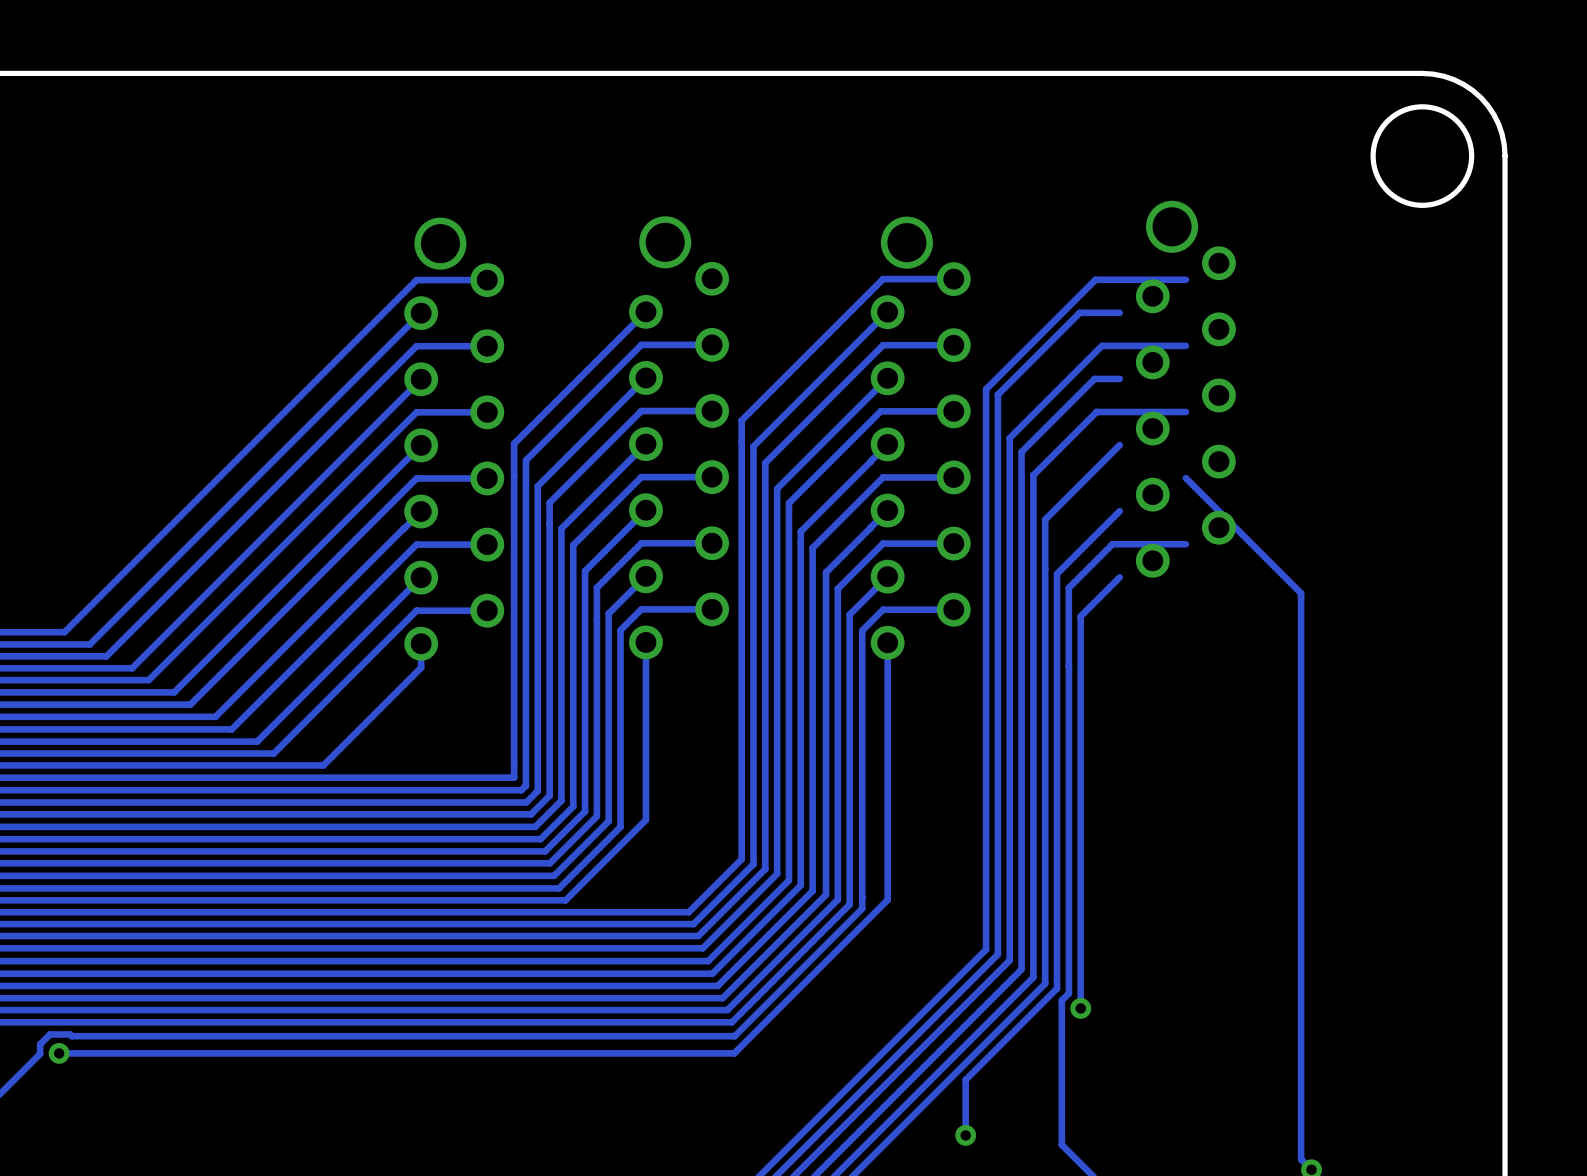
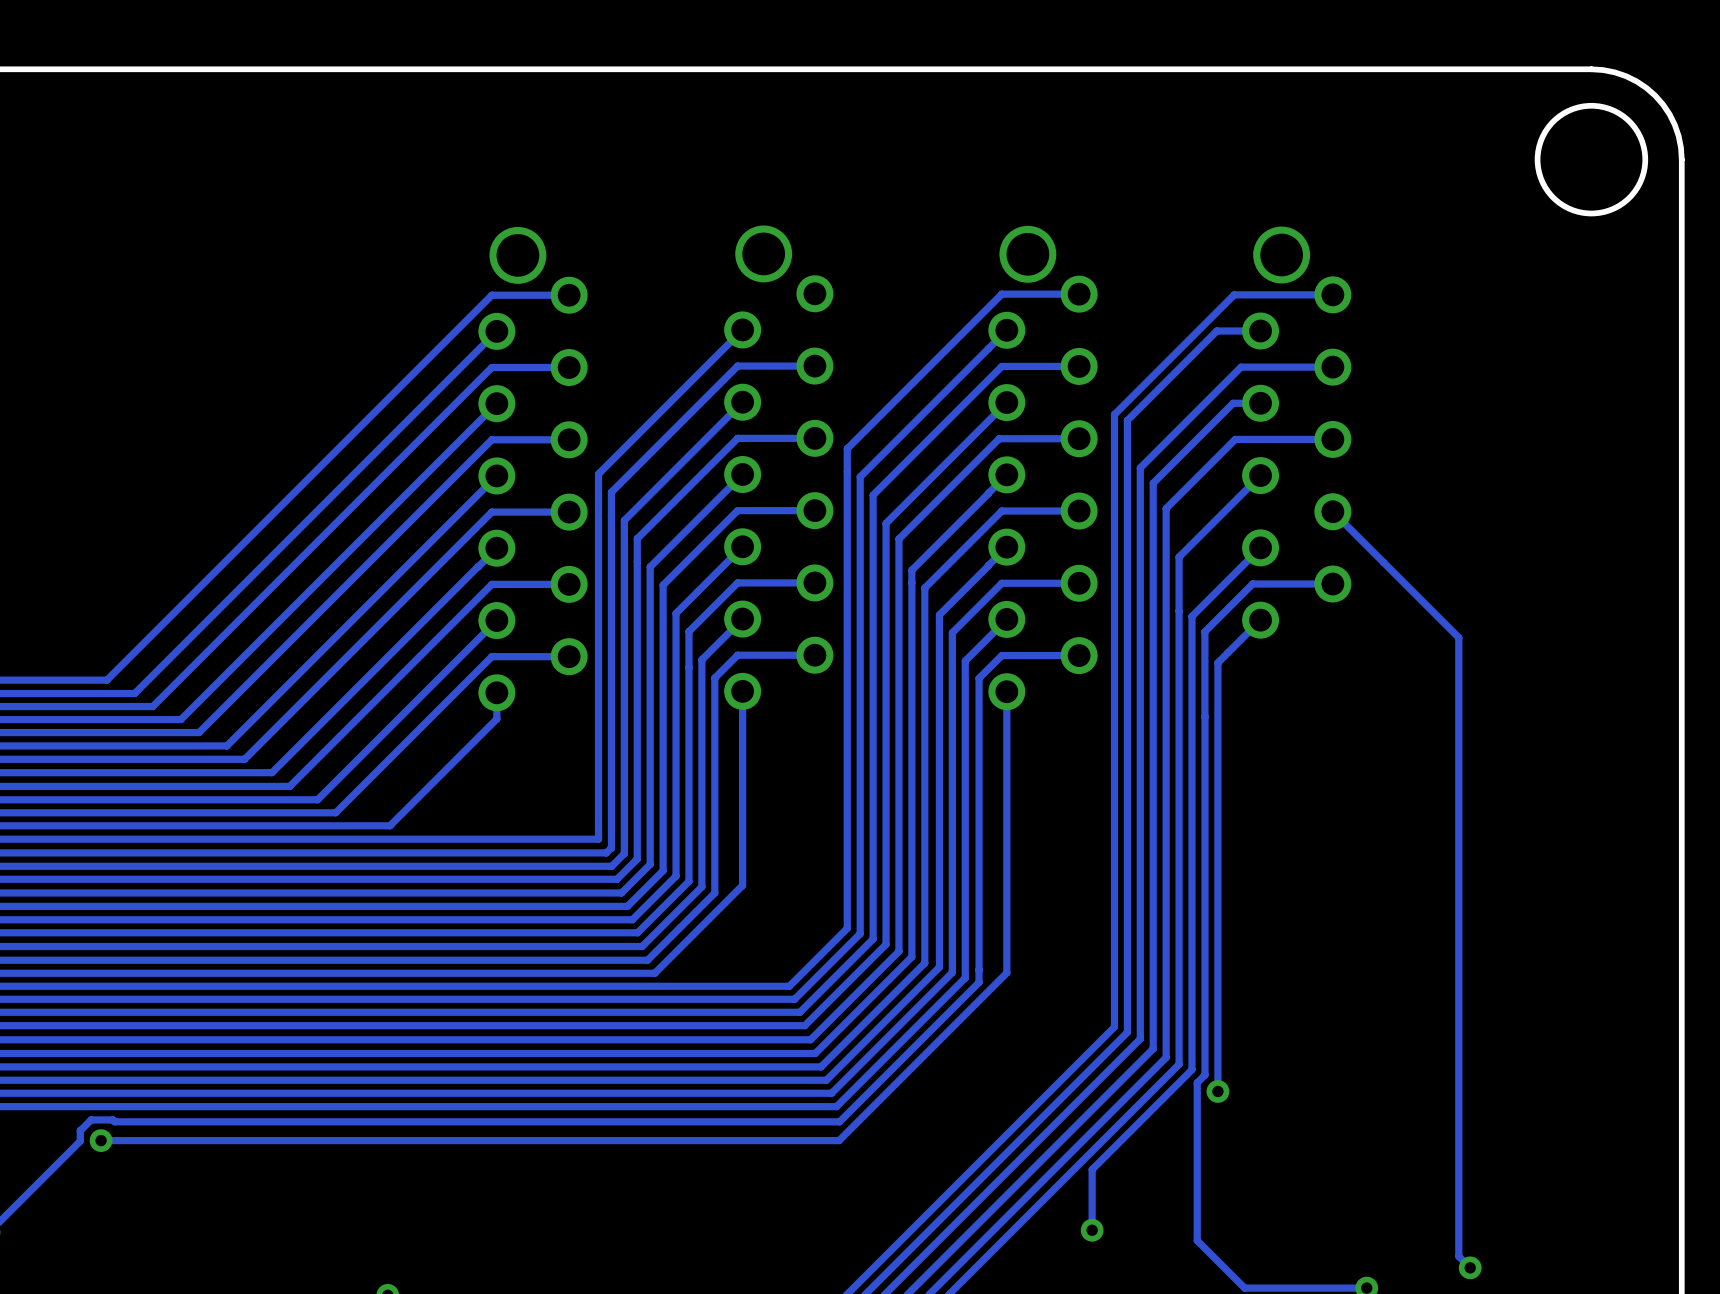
part position: (1185, 389) -> (1296, 432)

